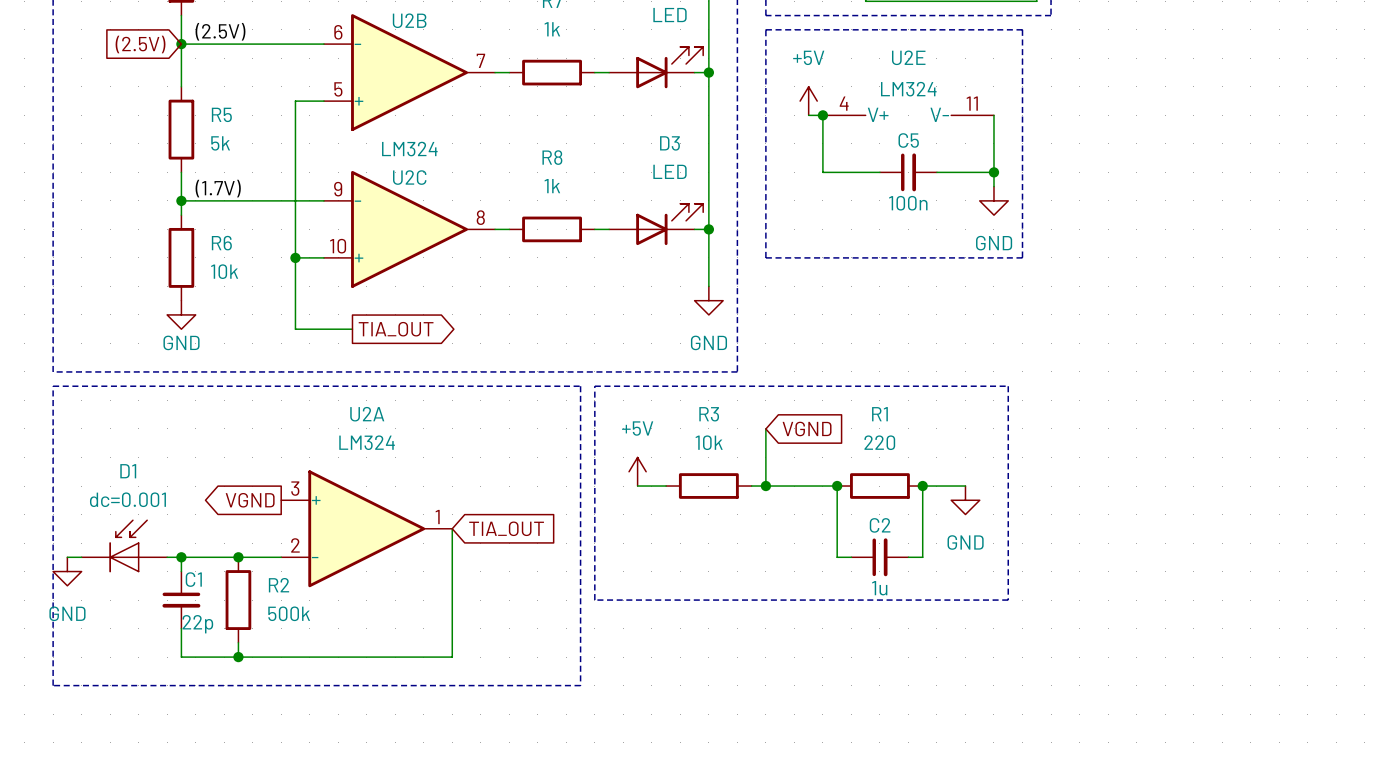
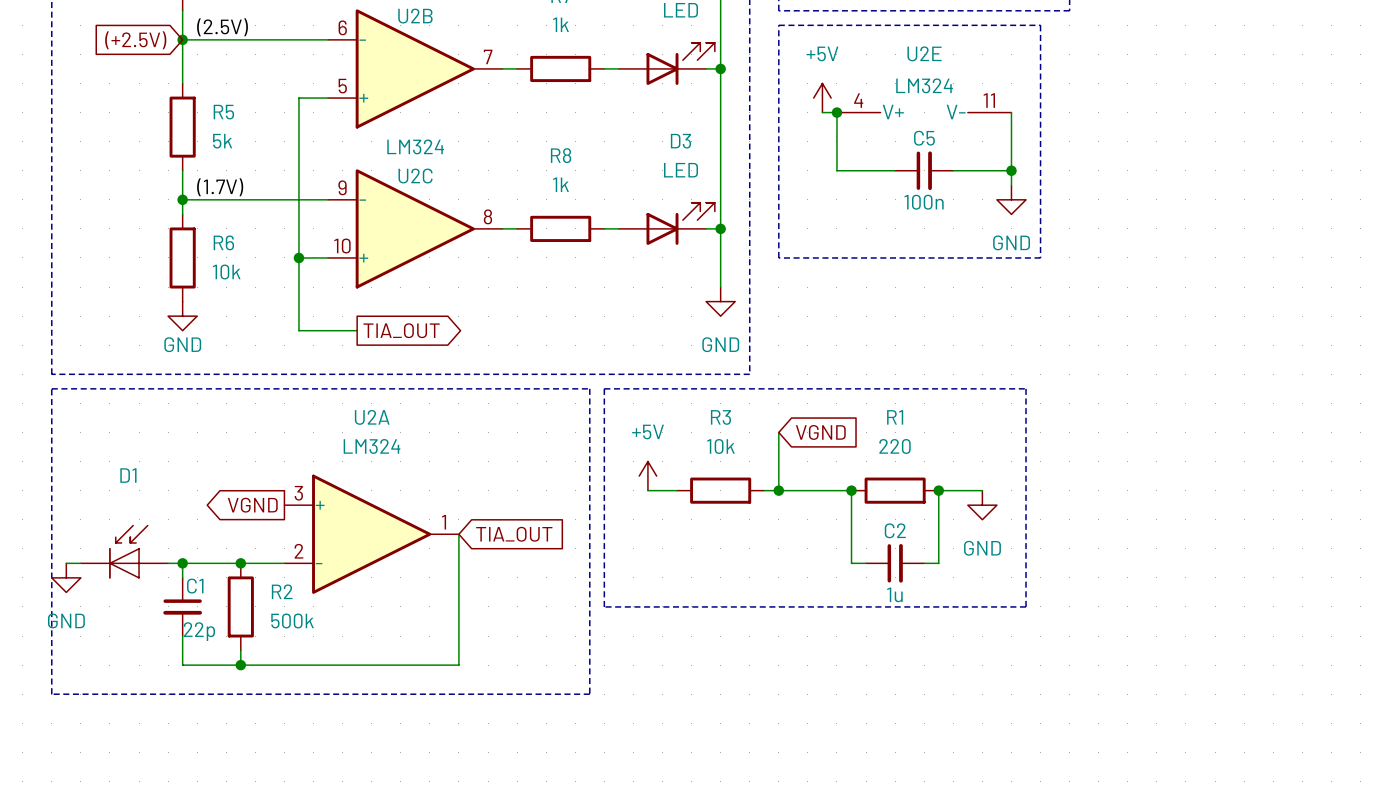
global label: (2.5V) (140, 44) -> (+2.5V) (135, 40)
D1 value: dc=0.001 (127, 499) -> none

